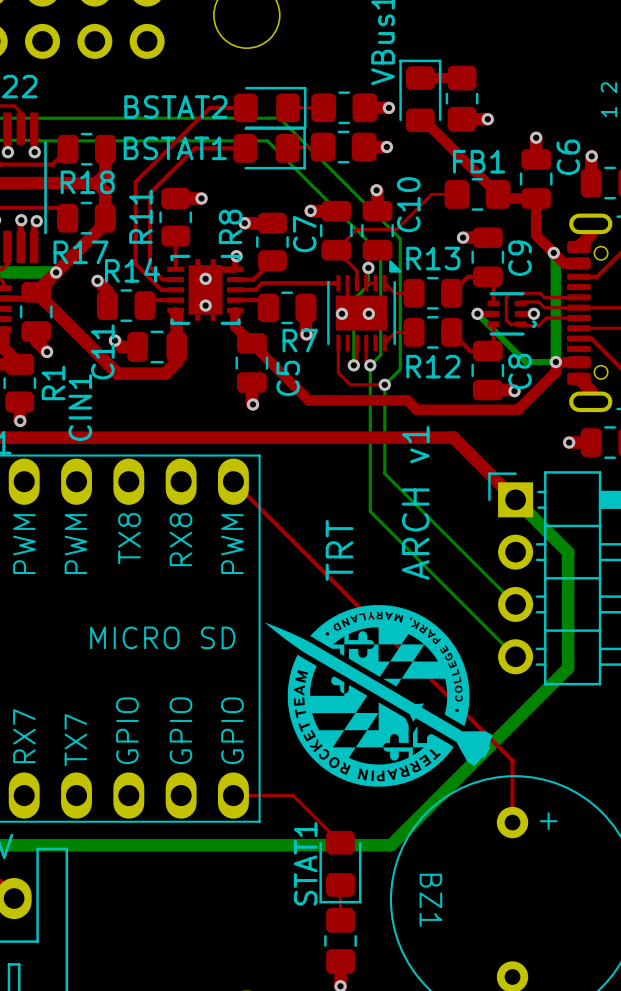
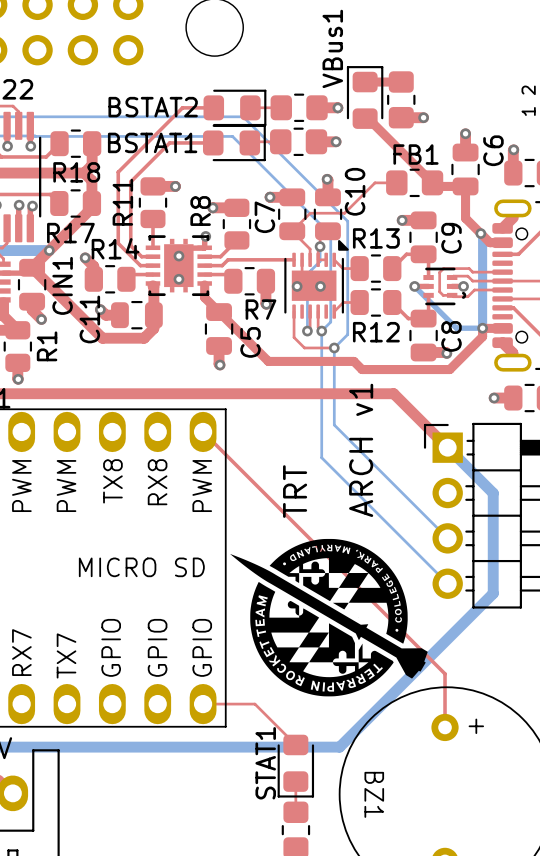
CIN1 name position: CIN1 (80, 407) -> CIN1 (62, 285)

